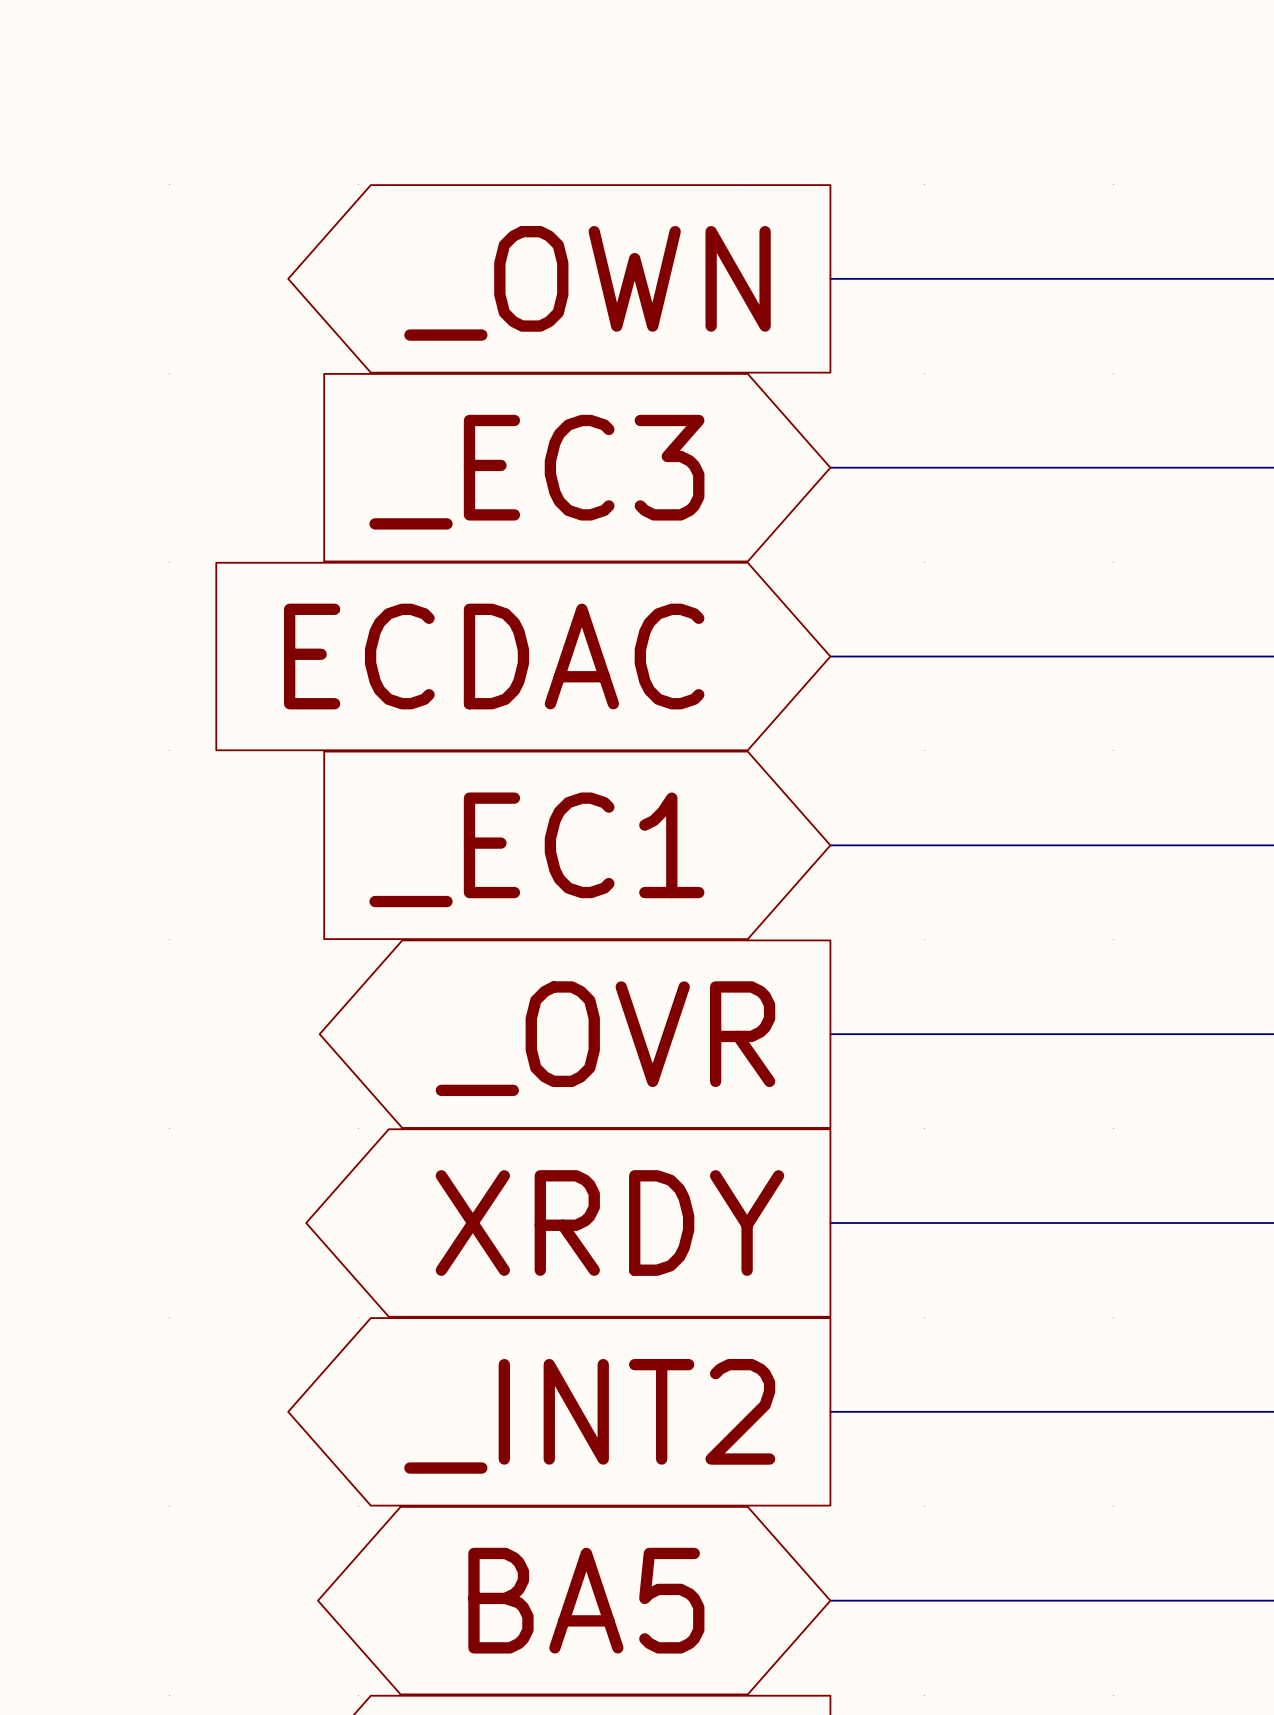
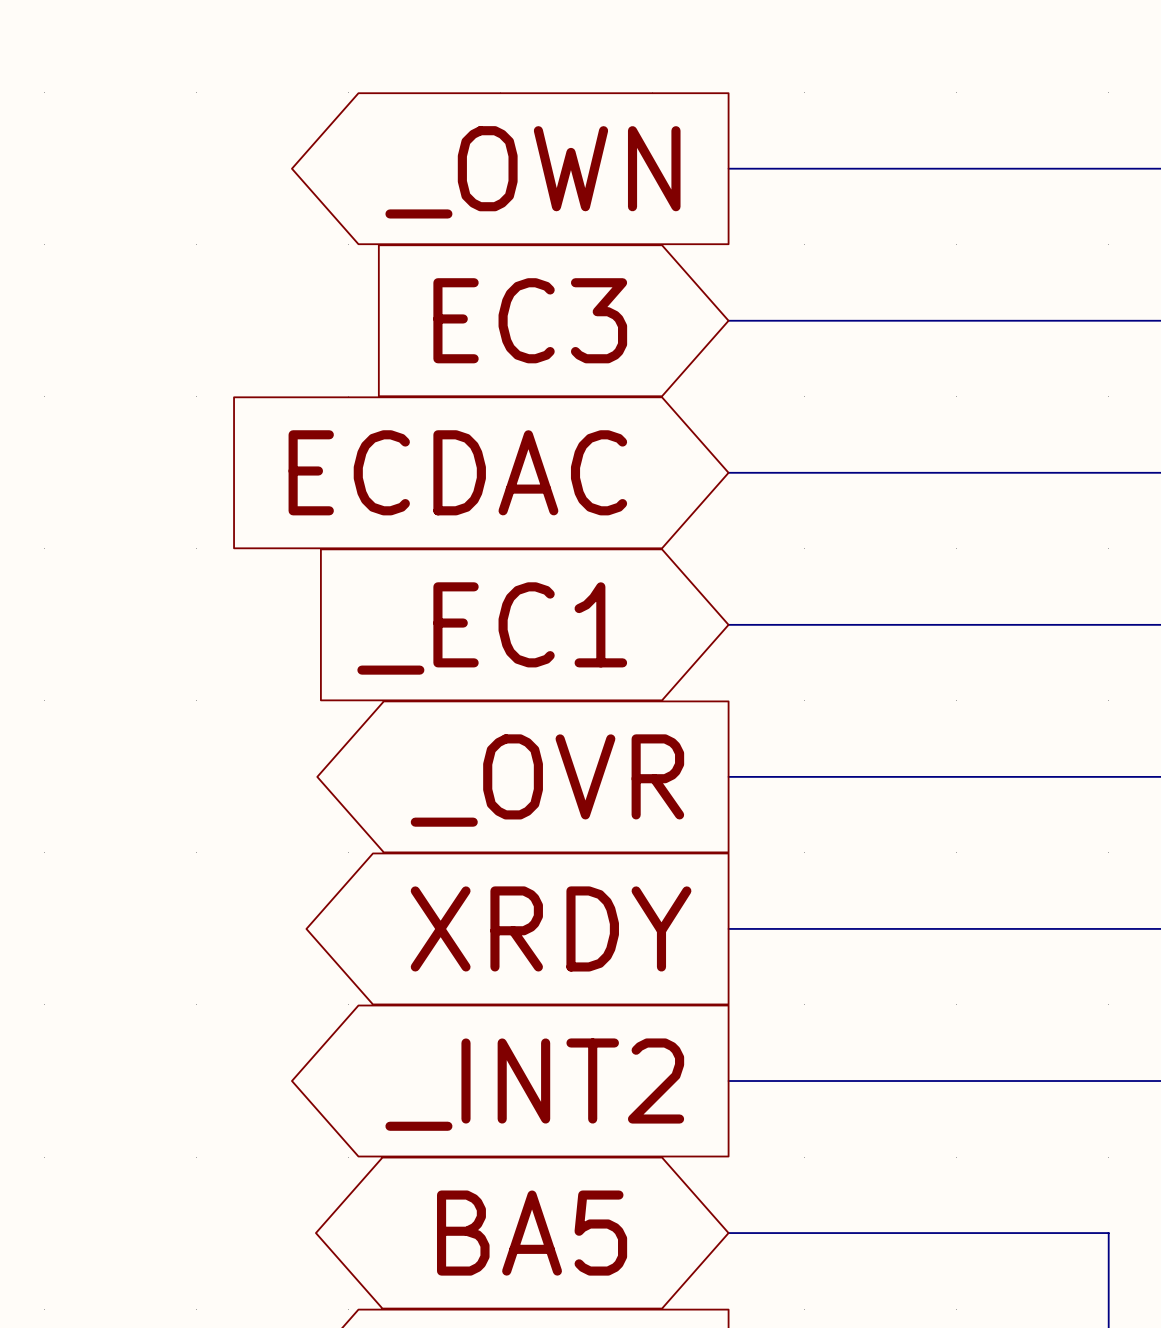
global label: _EC3 (536, 472) -> EC3 (530, 320)

